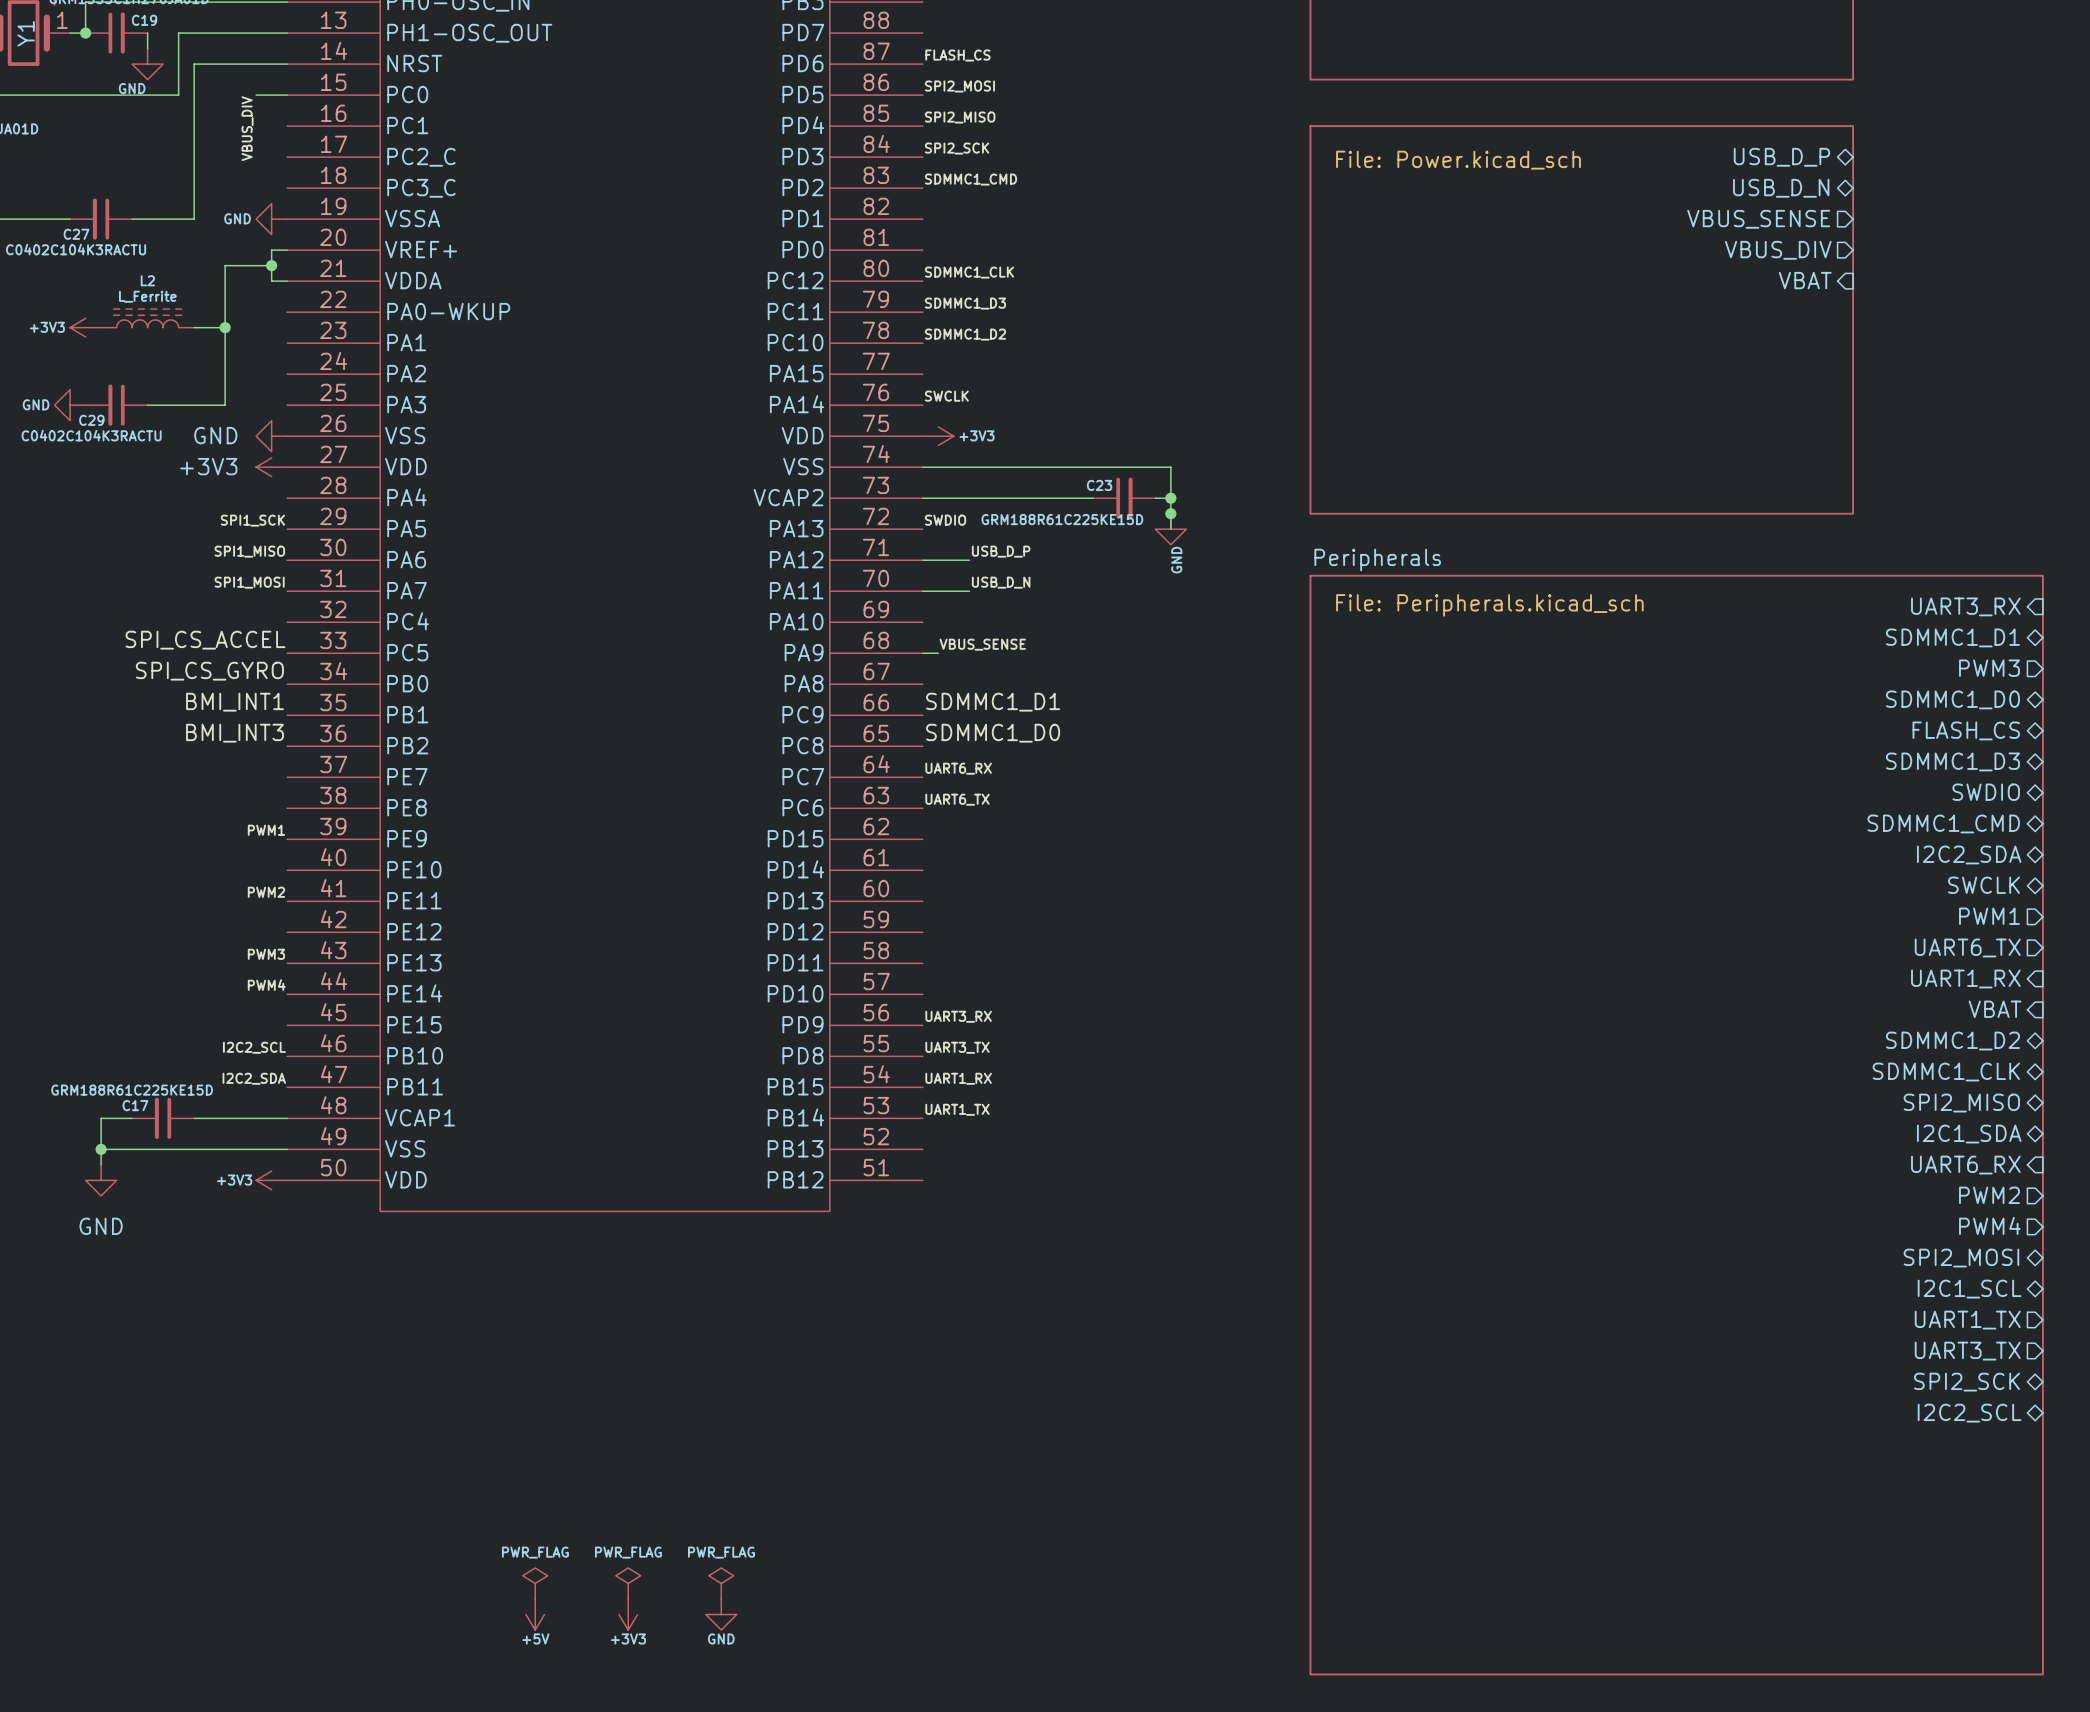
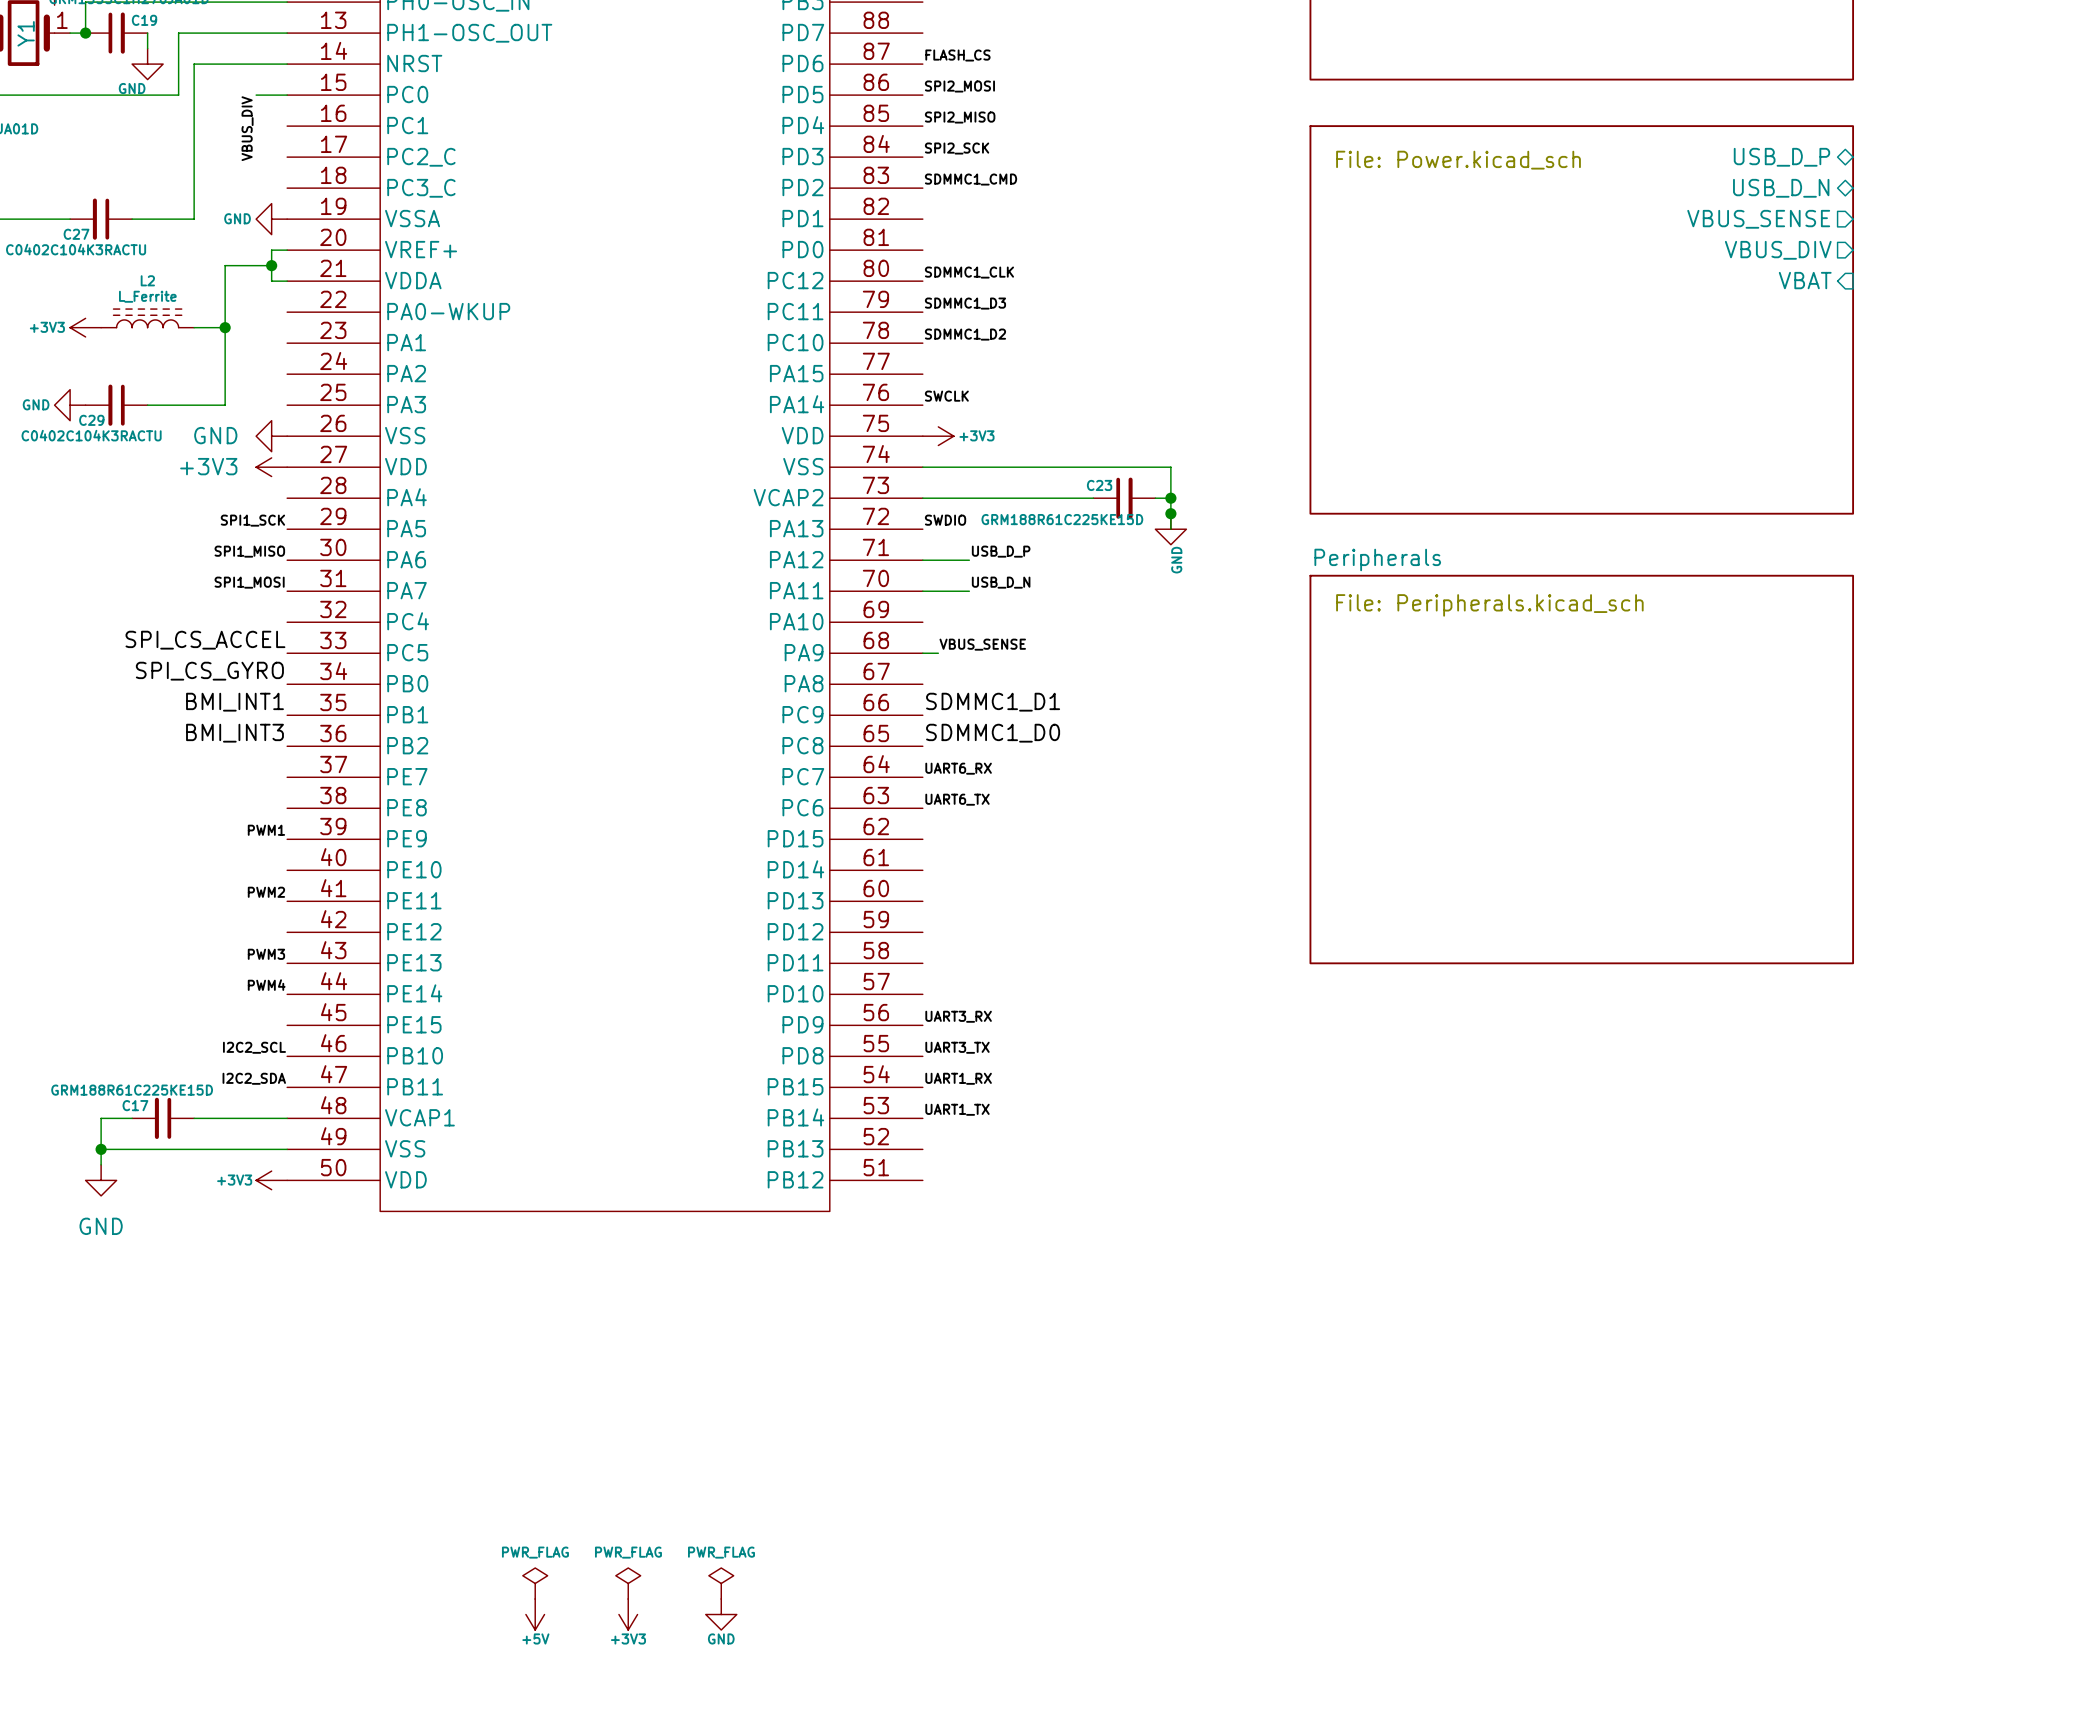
sheet pin: UART3_RX (1965, 606) -> none
sheet pin: SDMMC1_D1 (1952, 637) -> none
sheet pin: PWM3 (1989, 668) -> none
sheet pin: SDMMC1_D0 (1952, 699) -> none
sheet pin: FLASH_CS (1966, 730) -> none
sheet pin: SDMMC1_D3 (1952, 761) -> none
sheet Peripherals: none -> File: Peripherals.kicad_sch (1581, 769)
sheet pin: SWDIO (1986, 792) -> none
sheet pin: SDMMC1_CMD (1943, 823) -> none
sheet pin: I2C2_SDA (1969, 854) -> none
sheet pin: SWCLK (1983, 885) -> none
sheet pin: PWM1 (1989, 916) -> none
sheet pin: UART6_TX (1967, 947) -> none
sheet pin: UART1_RX (1965, 978) -> none
sheet pin: VBAT (1995, 1009) -> none
sheet pin: SDMMC1_D2 (1952, 1041) -> none
sheet pin: SDMMC1_CLK (1946, 1072) -> none
sheet pin: SPI2_MISO (1961, 1103) -> none
sheet Peripherals: File: Peripherals.kicad_sch (1676, 1125) -> none
sheet pin: I2C1_SDA (1969, 1134) -> none
sheet pin: UART6_RX (1965, 1165) -> none
sheet pin: PWM2 (1989, 1195) -> none
sheet pin: PWM4 (1989, 1225) -> none
sheet pin: SPI2_MOSI (1961, 1258) -> none
sheet pin: I2C1_SCL (1969, 1289) -> none
sheet pin: UART1_TX (1967, 1320) -> none
sheet pin: UART3_TX (1967, 1351) -> none
sheet pin: SPI2_SCK (1966, 1382) -> none
sheet pin: I2C2_SCL (1969, 1413) -> none

